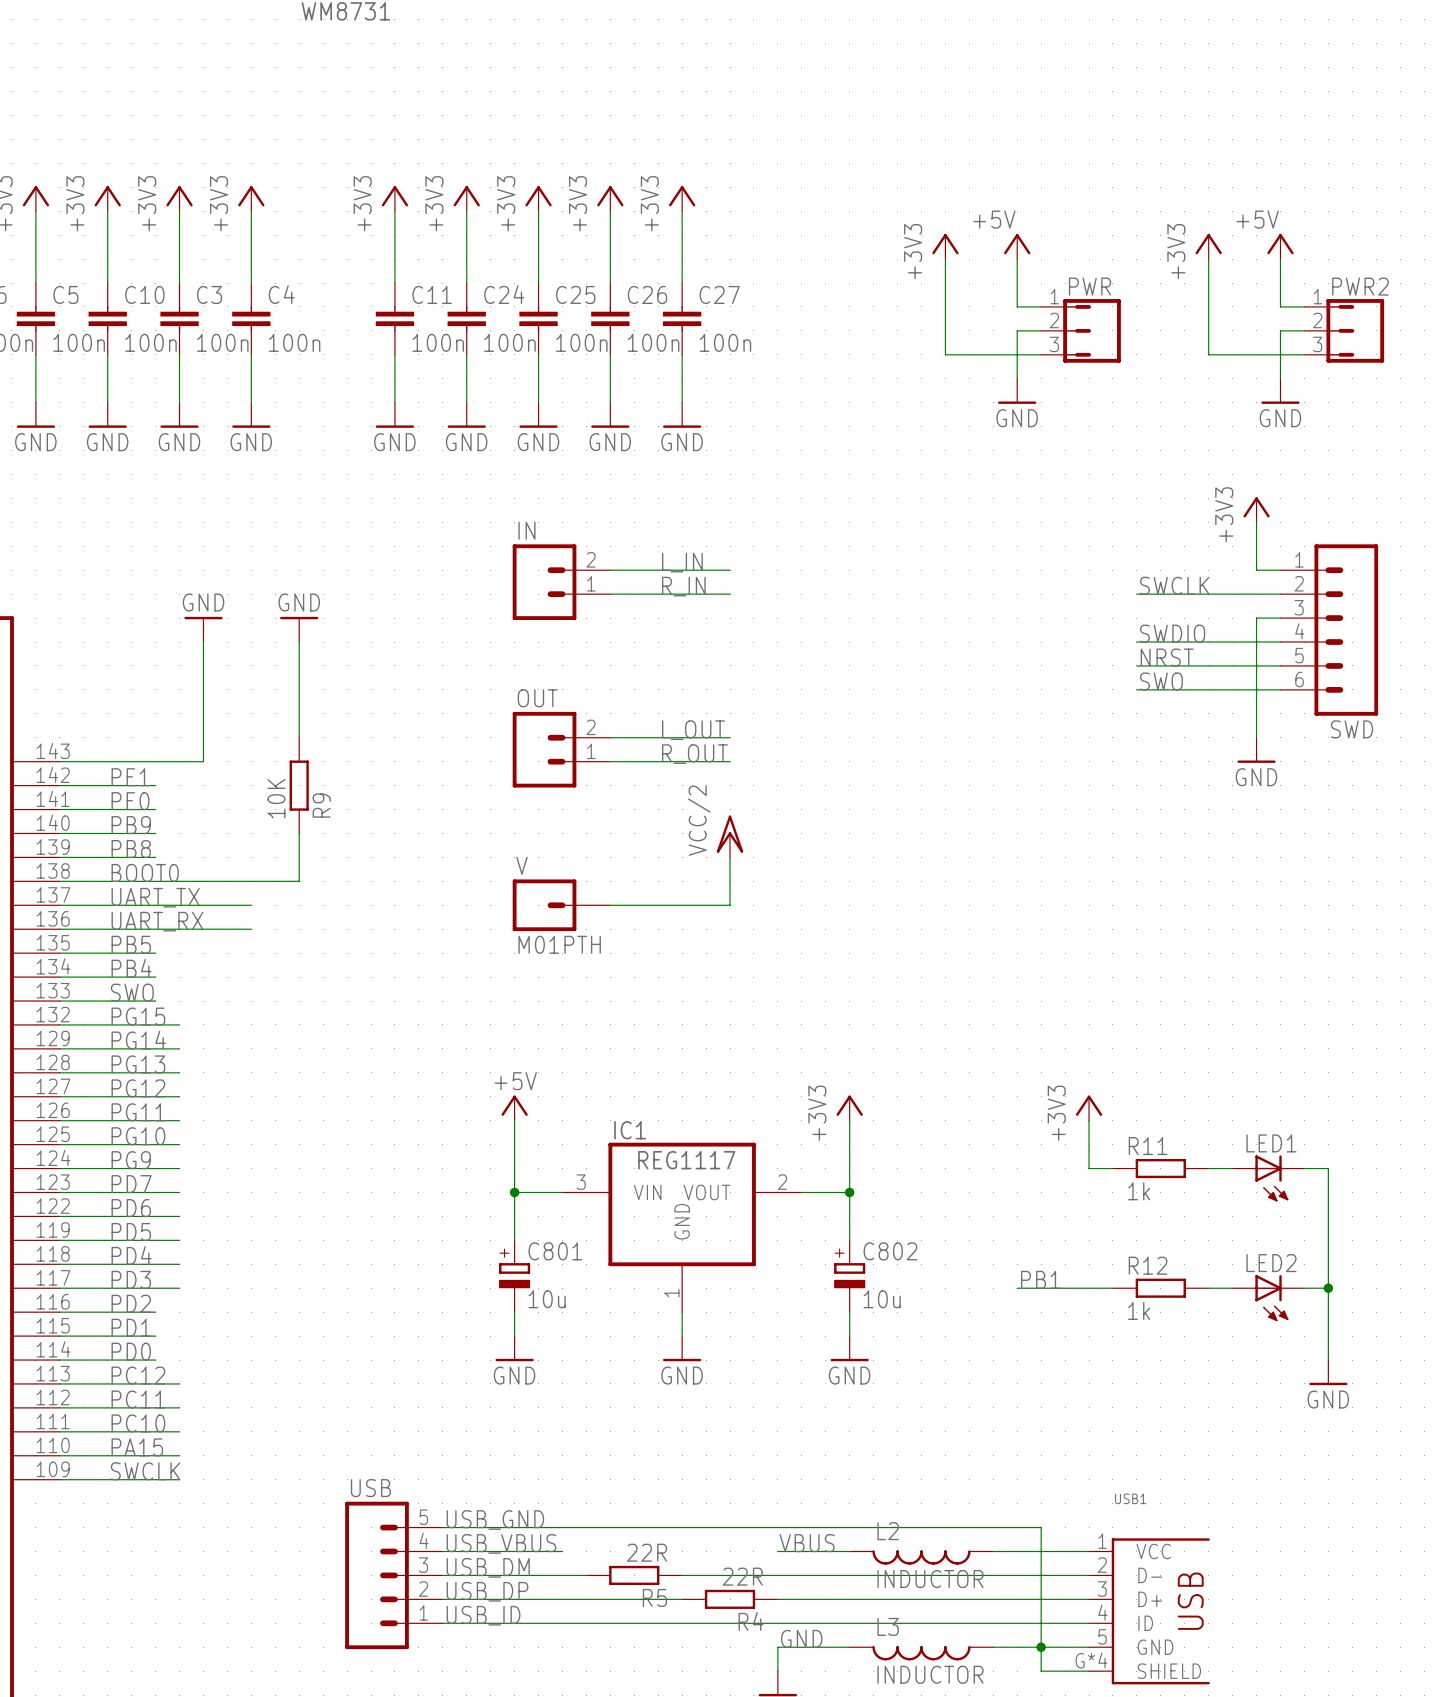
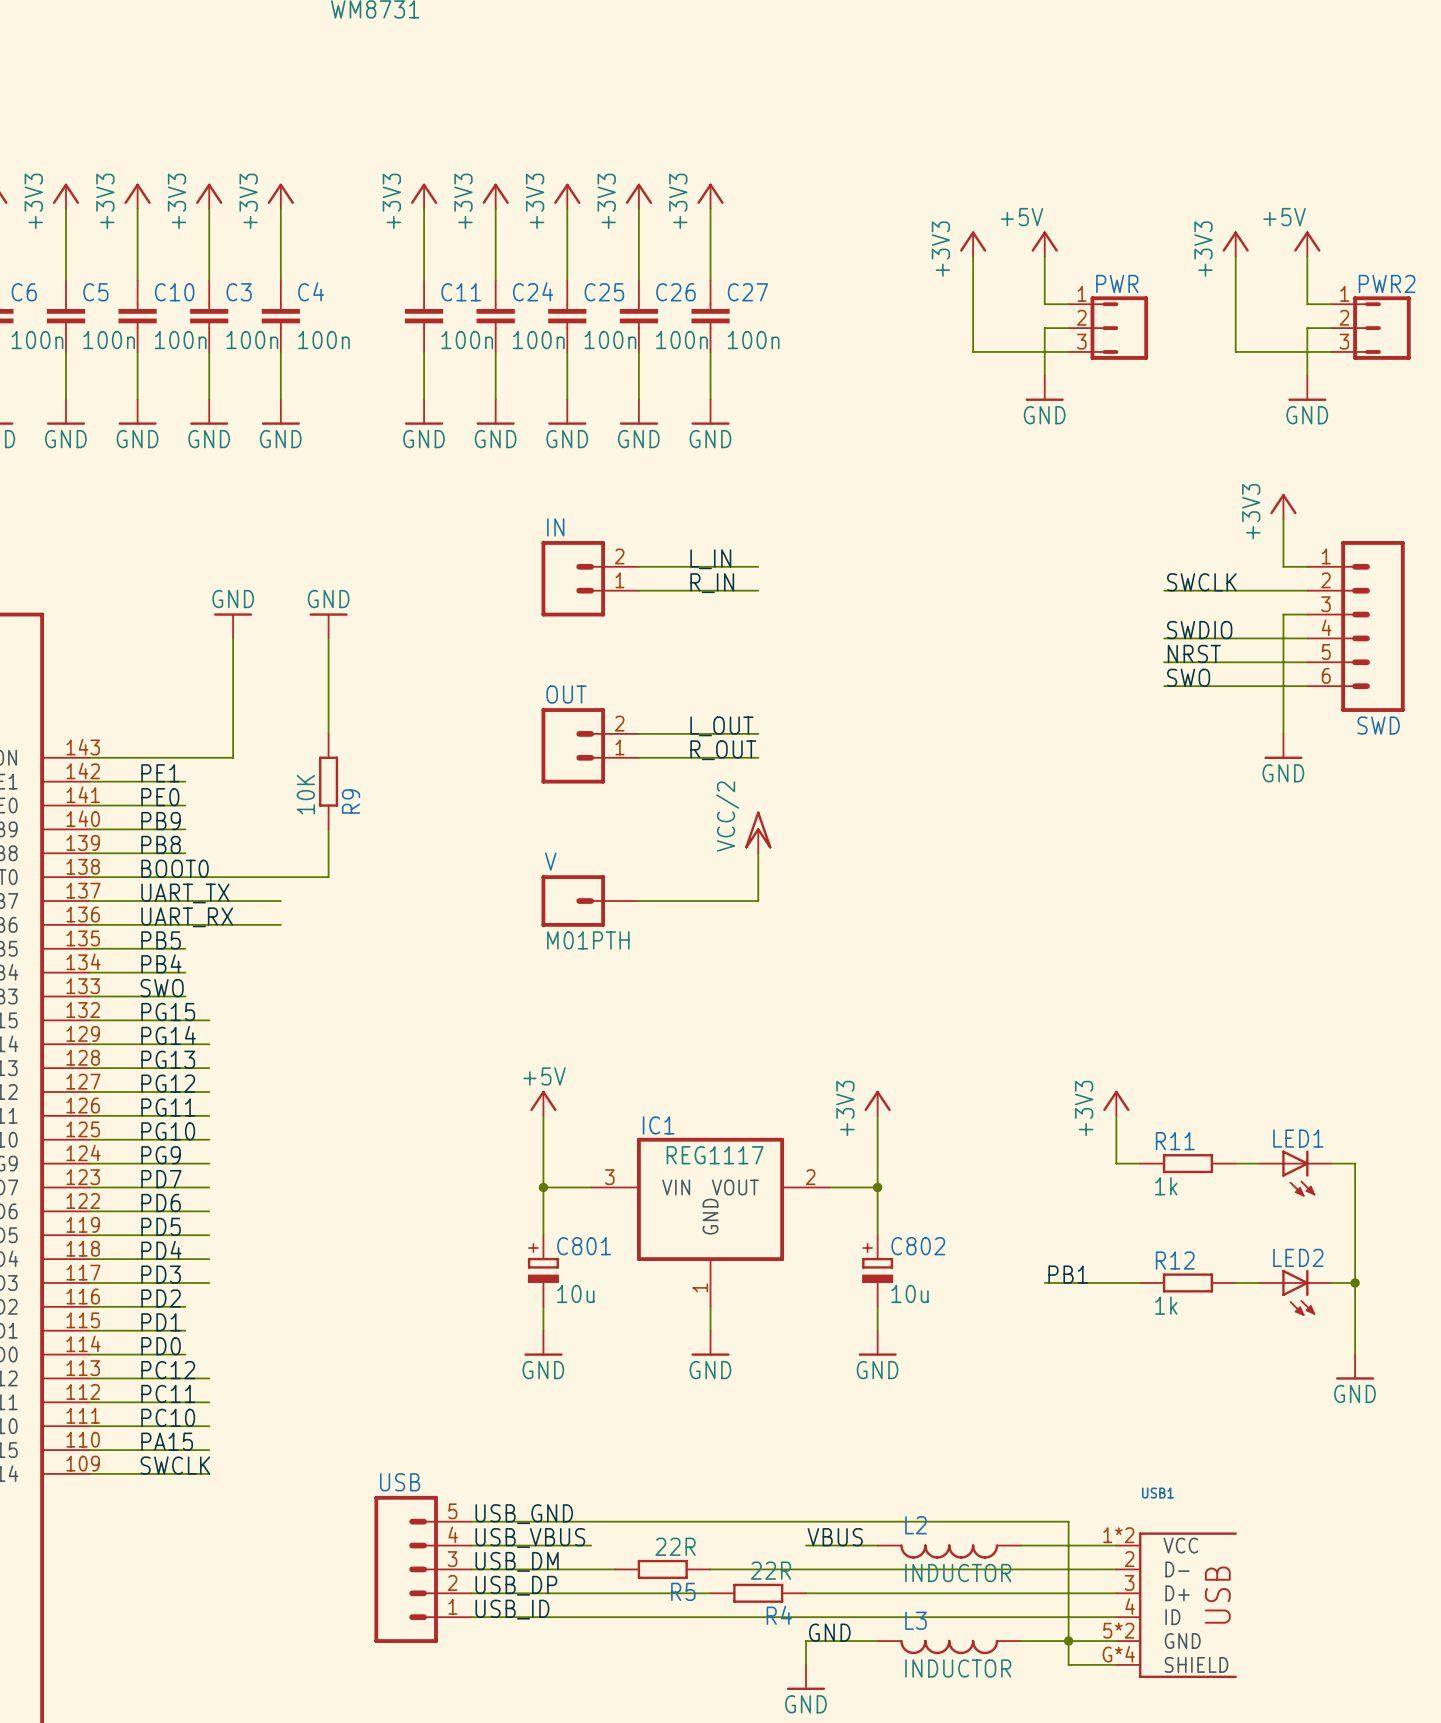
USB1 pin number: 1 (1102, 1541) -> 1*2 (1118, 1535)
USB1 pin number: 5 (1102, 1636) -> 5*2 (1118, 1630)

